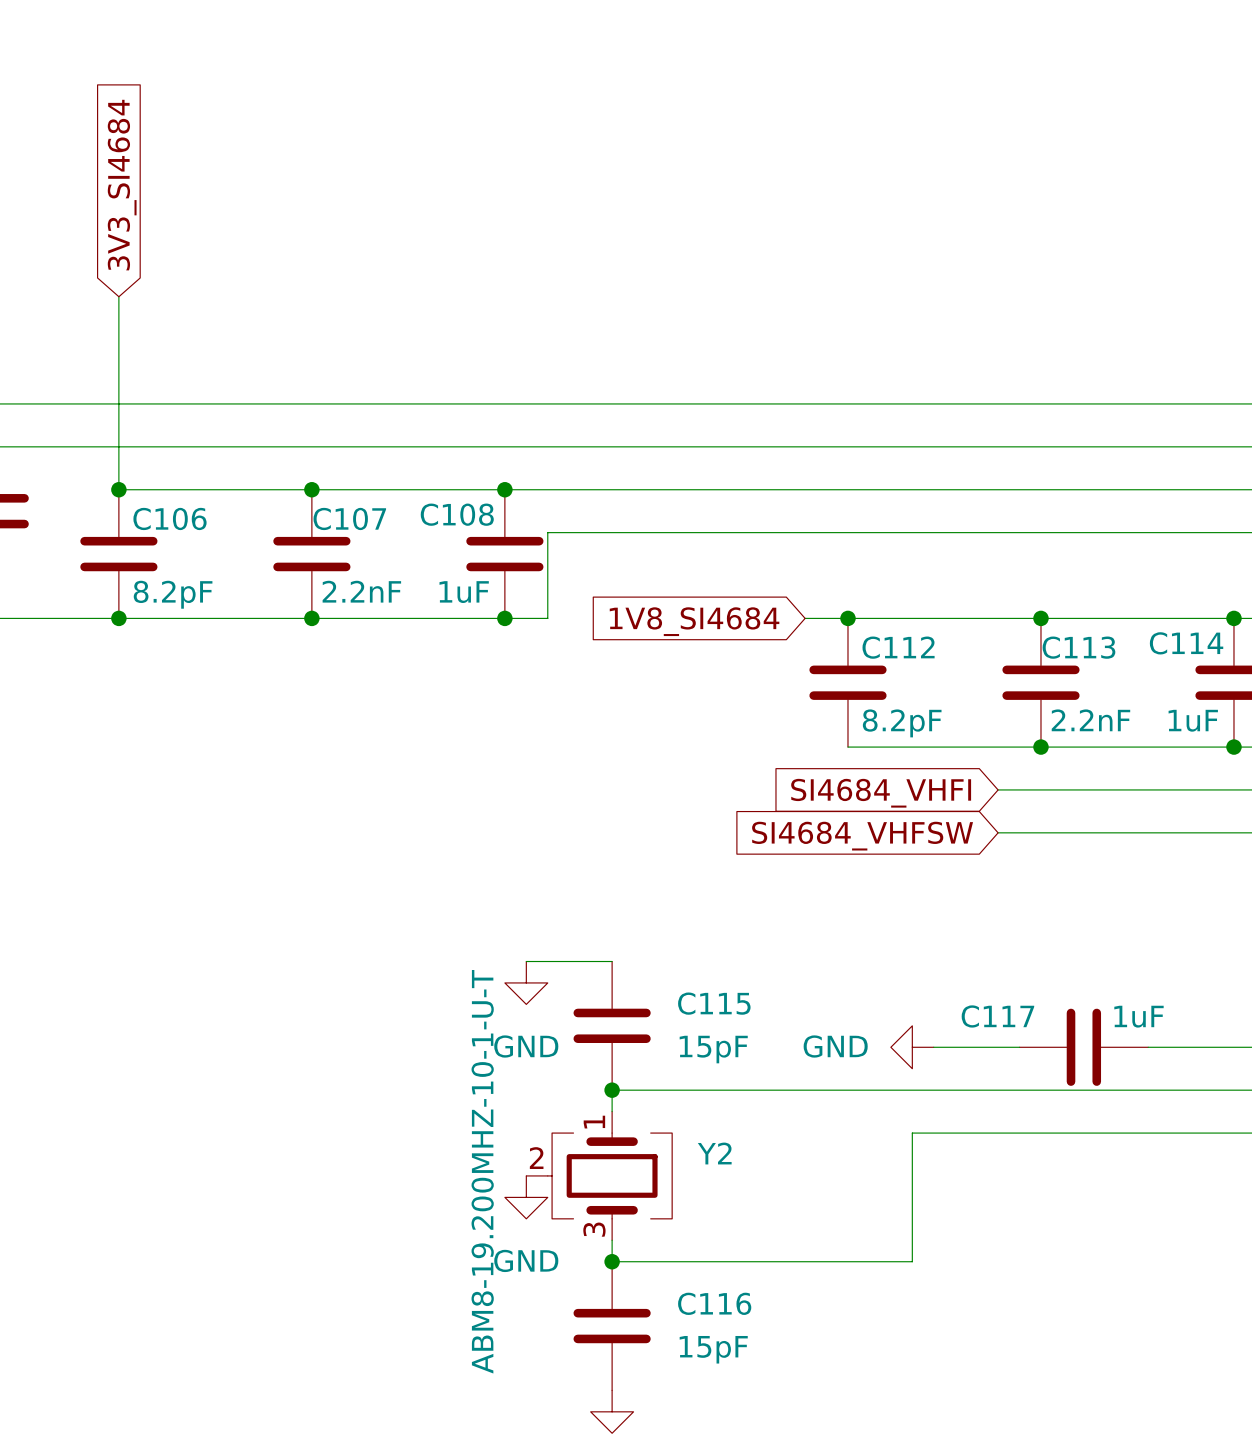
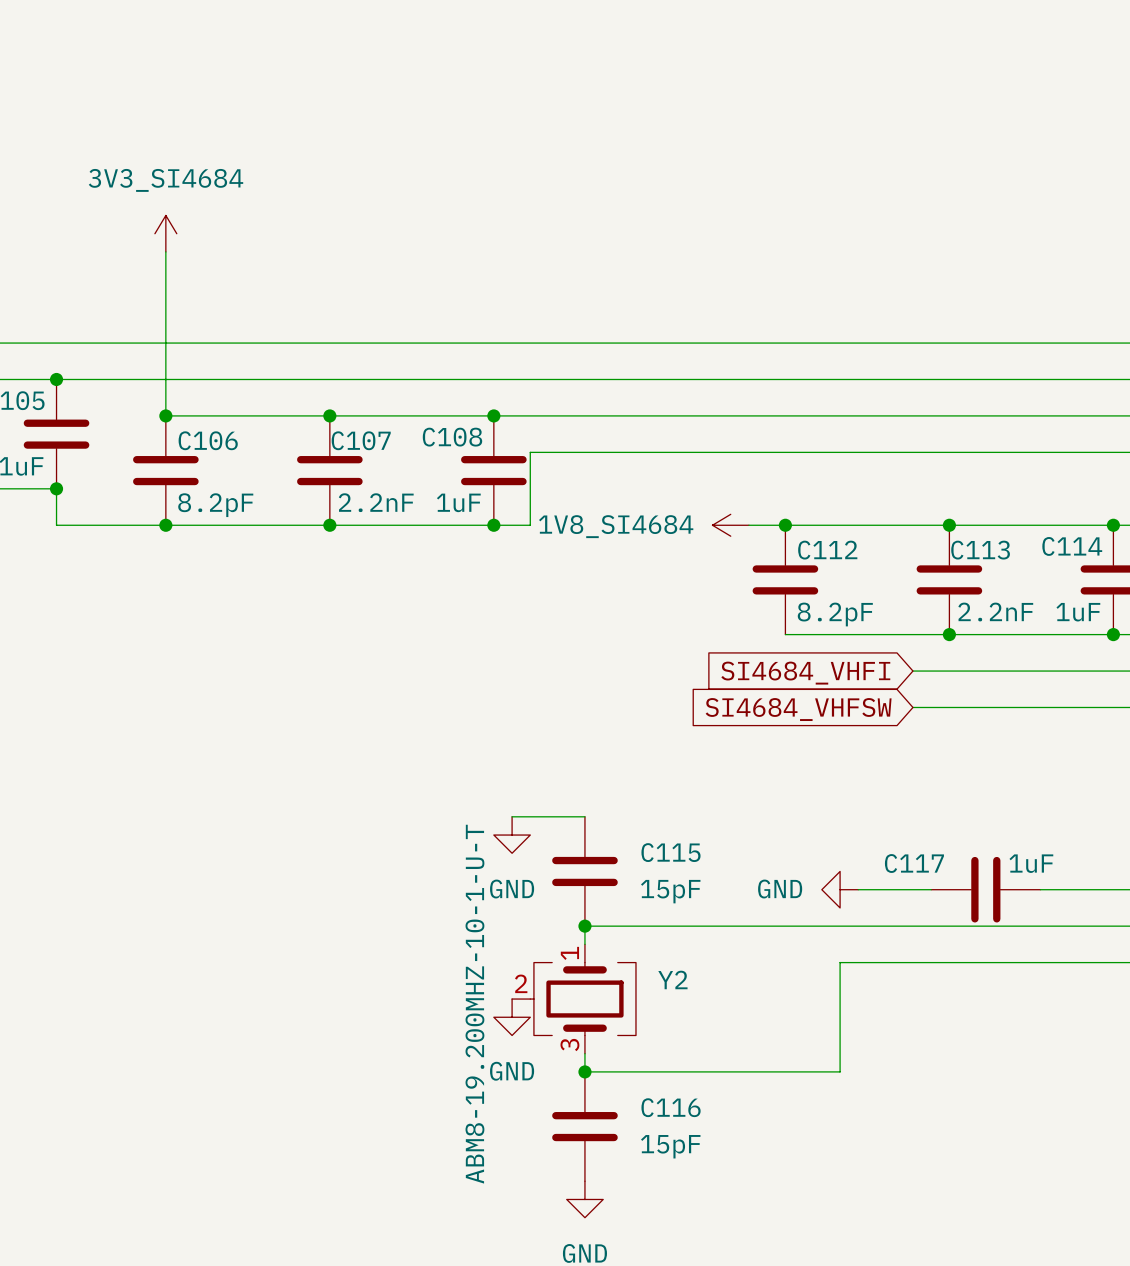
global label: 3V3_SI4684 (122, 185) -> none
power symbol: none -> 3V3_SI4684 (165, 233)
power symbol: none -> 1V8_SI4684 (730, 525)
global label: 1V8_SI4684 (694, 621) -> none

